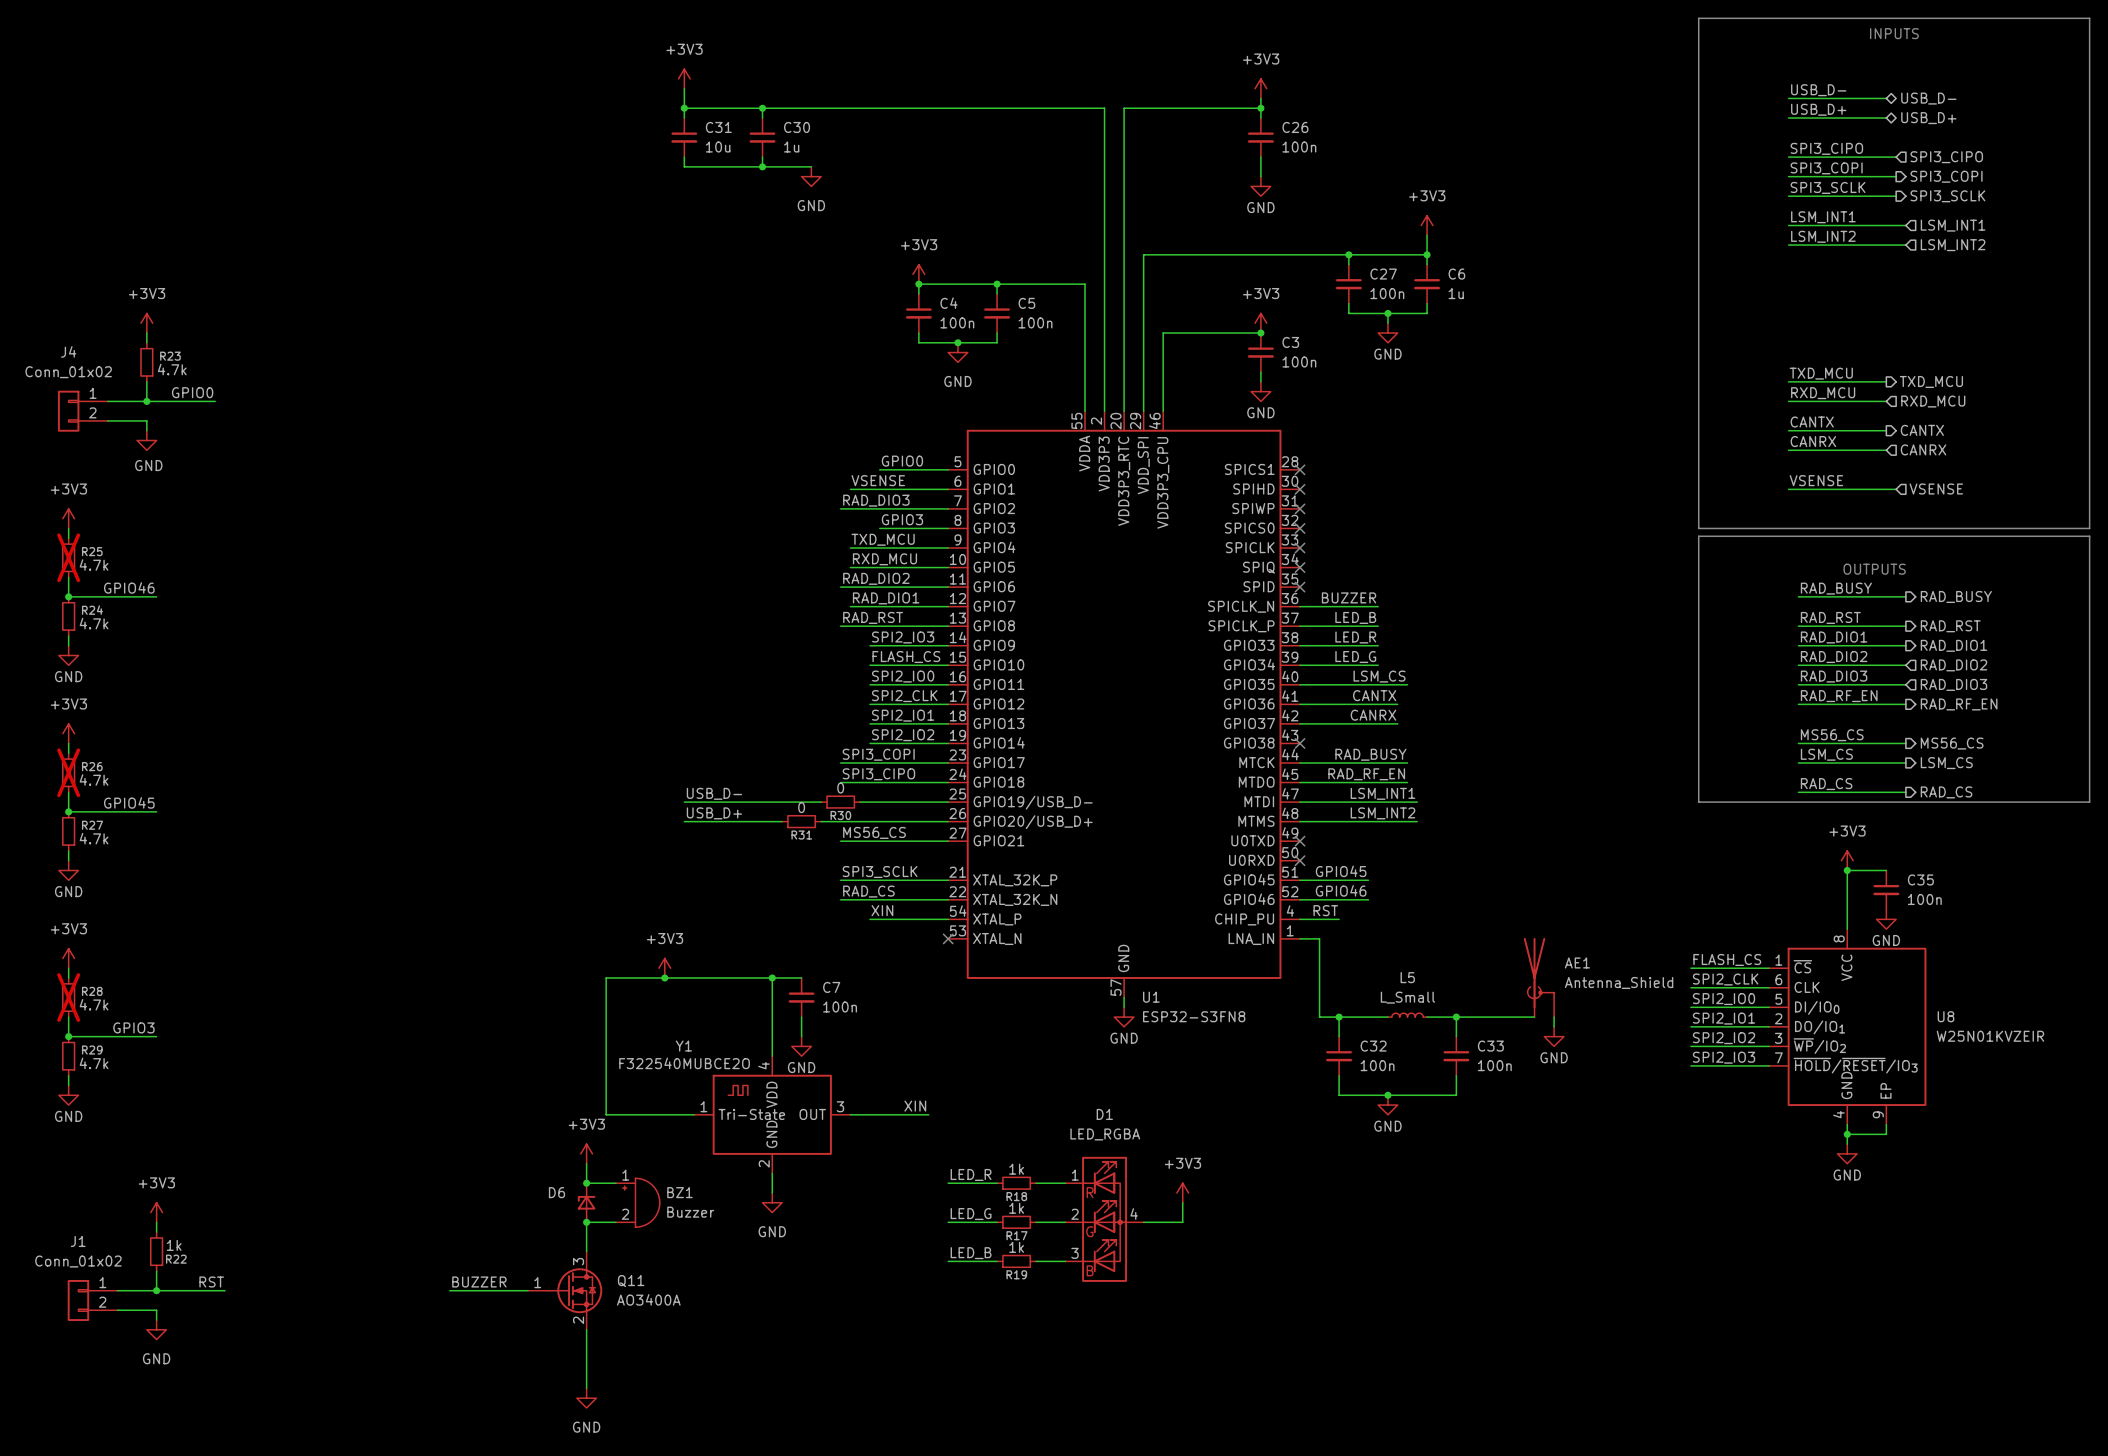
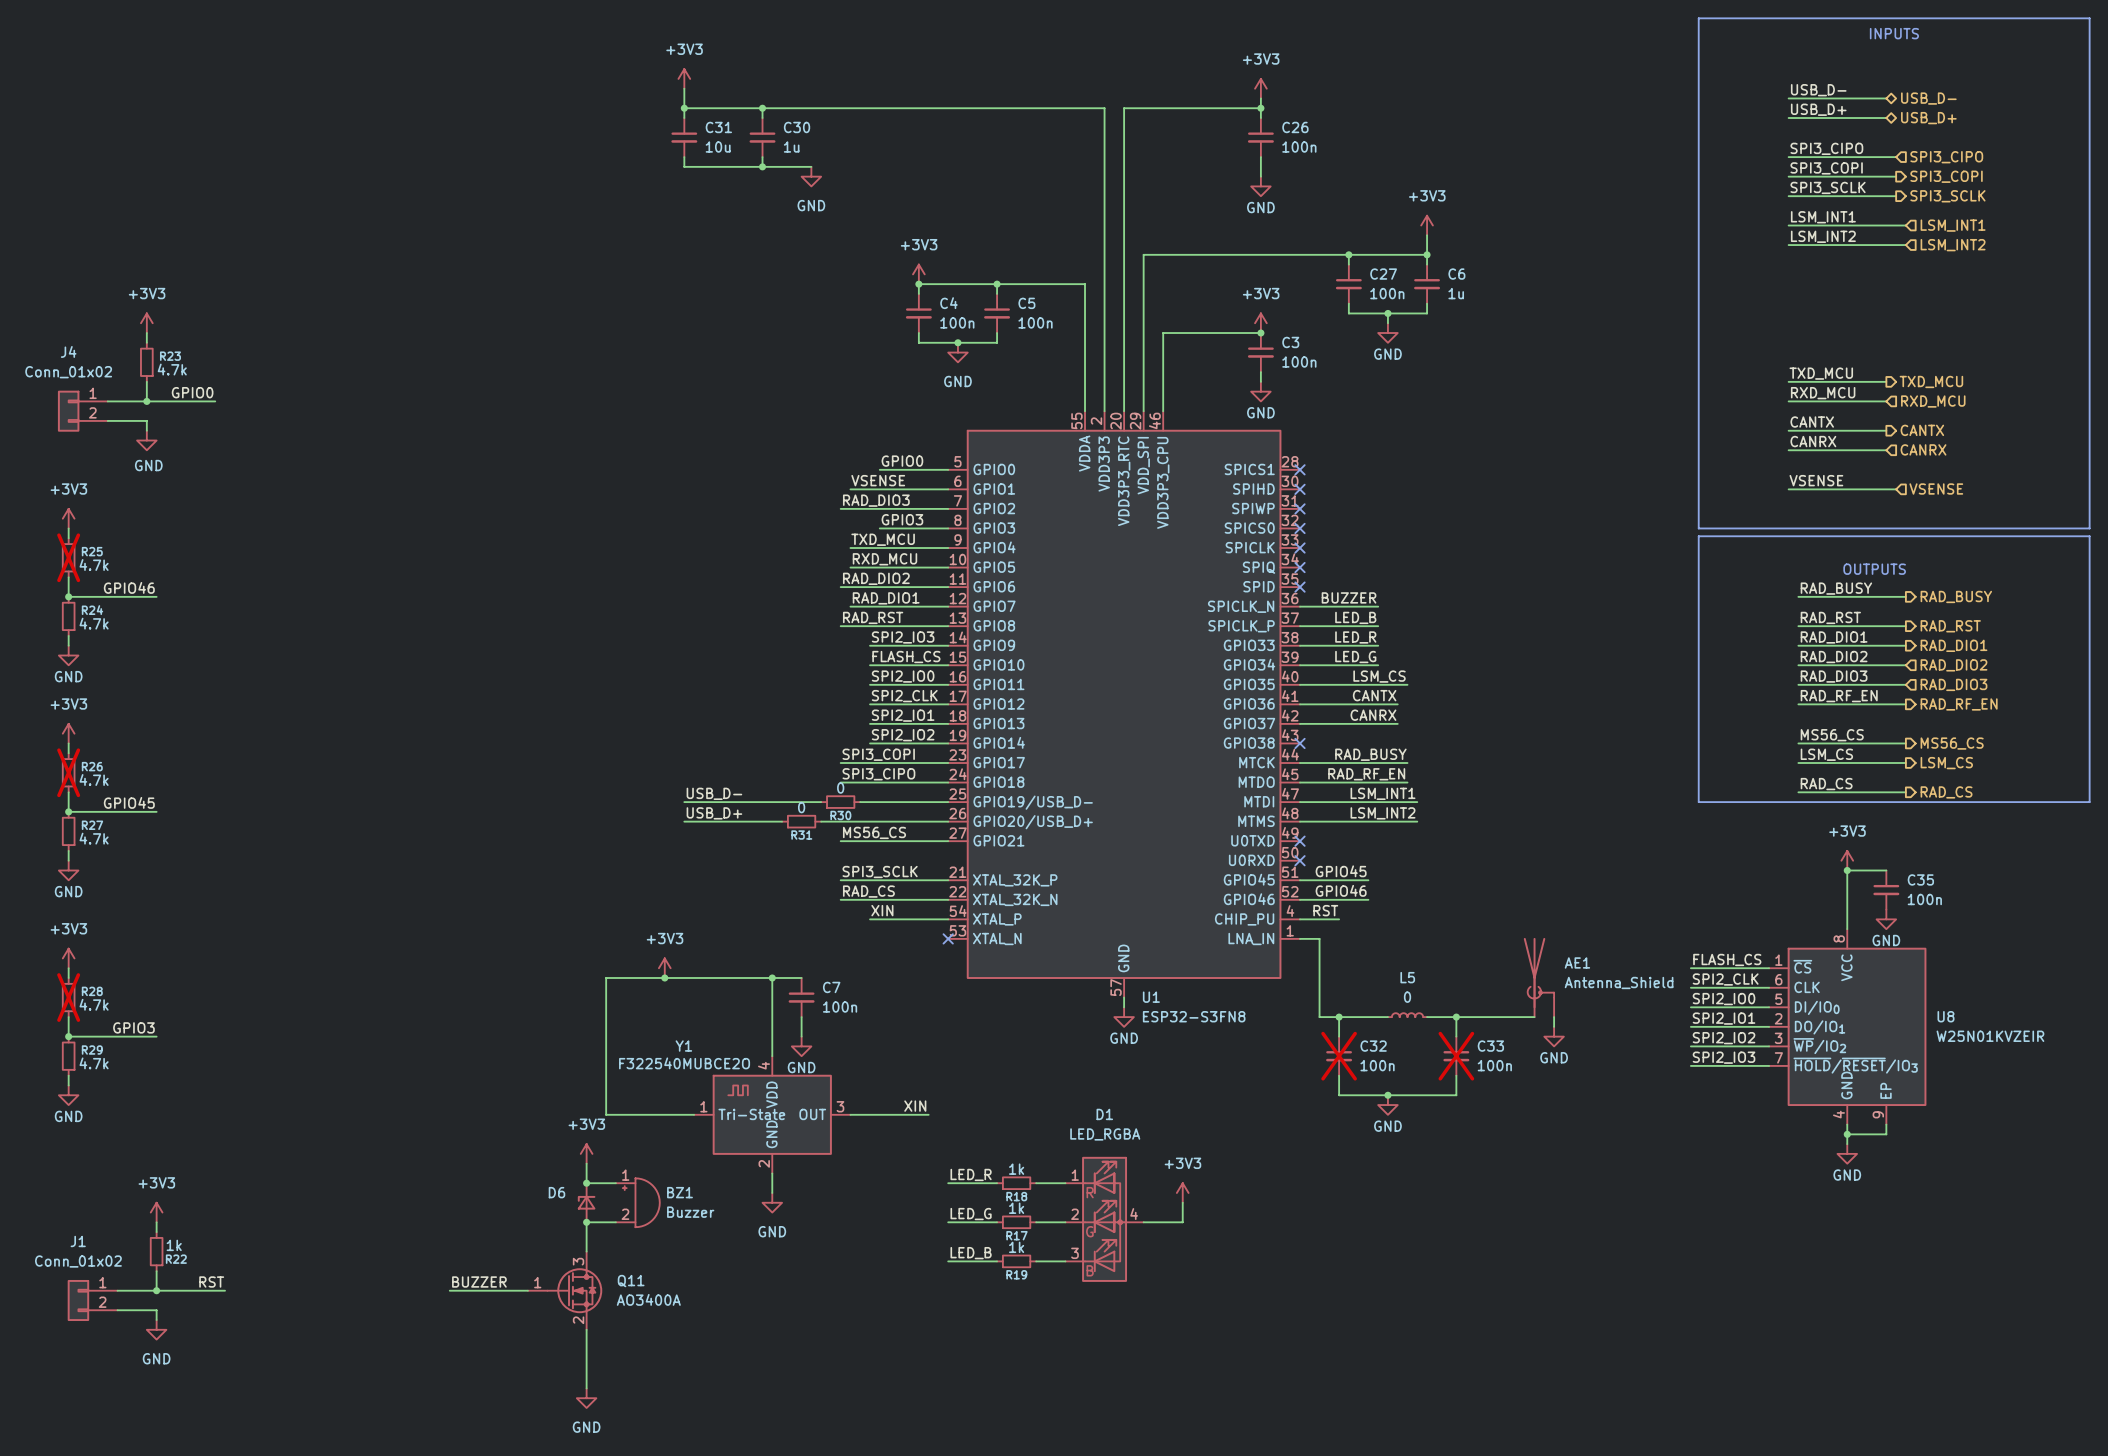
L5 value: L_Small (1407, 997) -> 0 (1407, 997)
C32 do-not-place cross: none -> (1339, 1056)
C33 do-not-place cross: none -> (1456, 1056)

